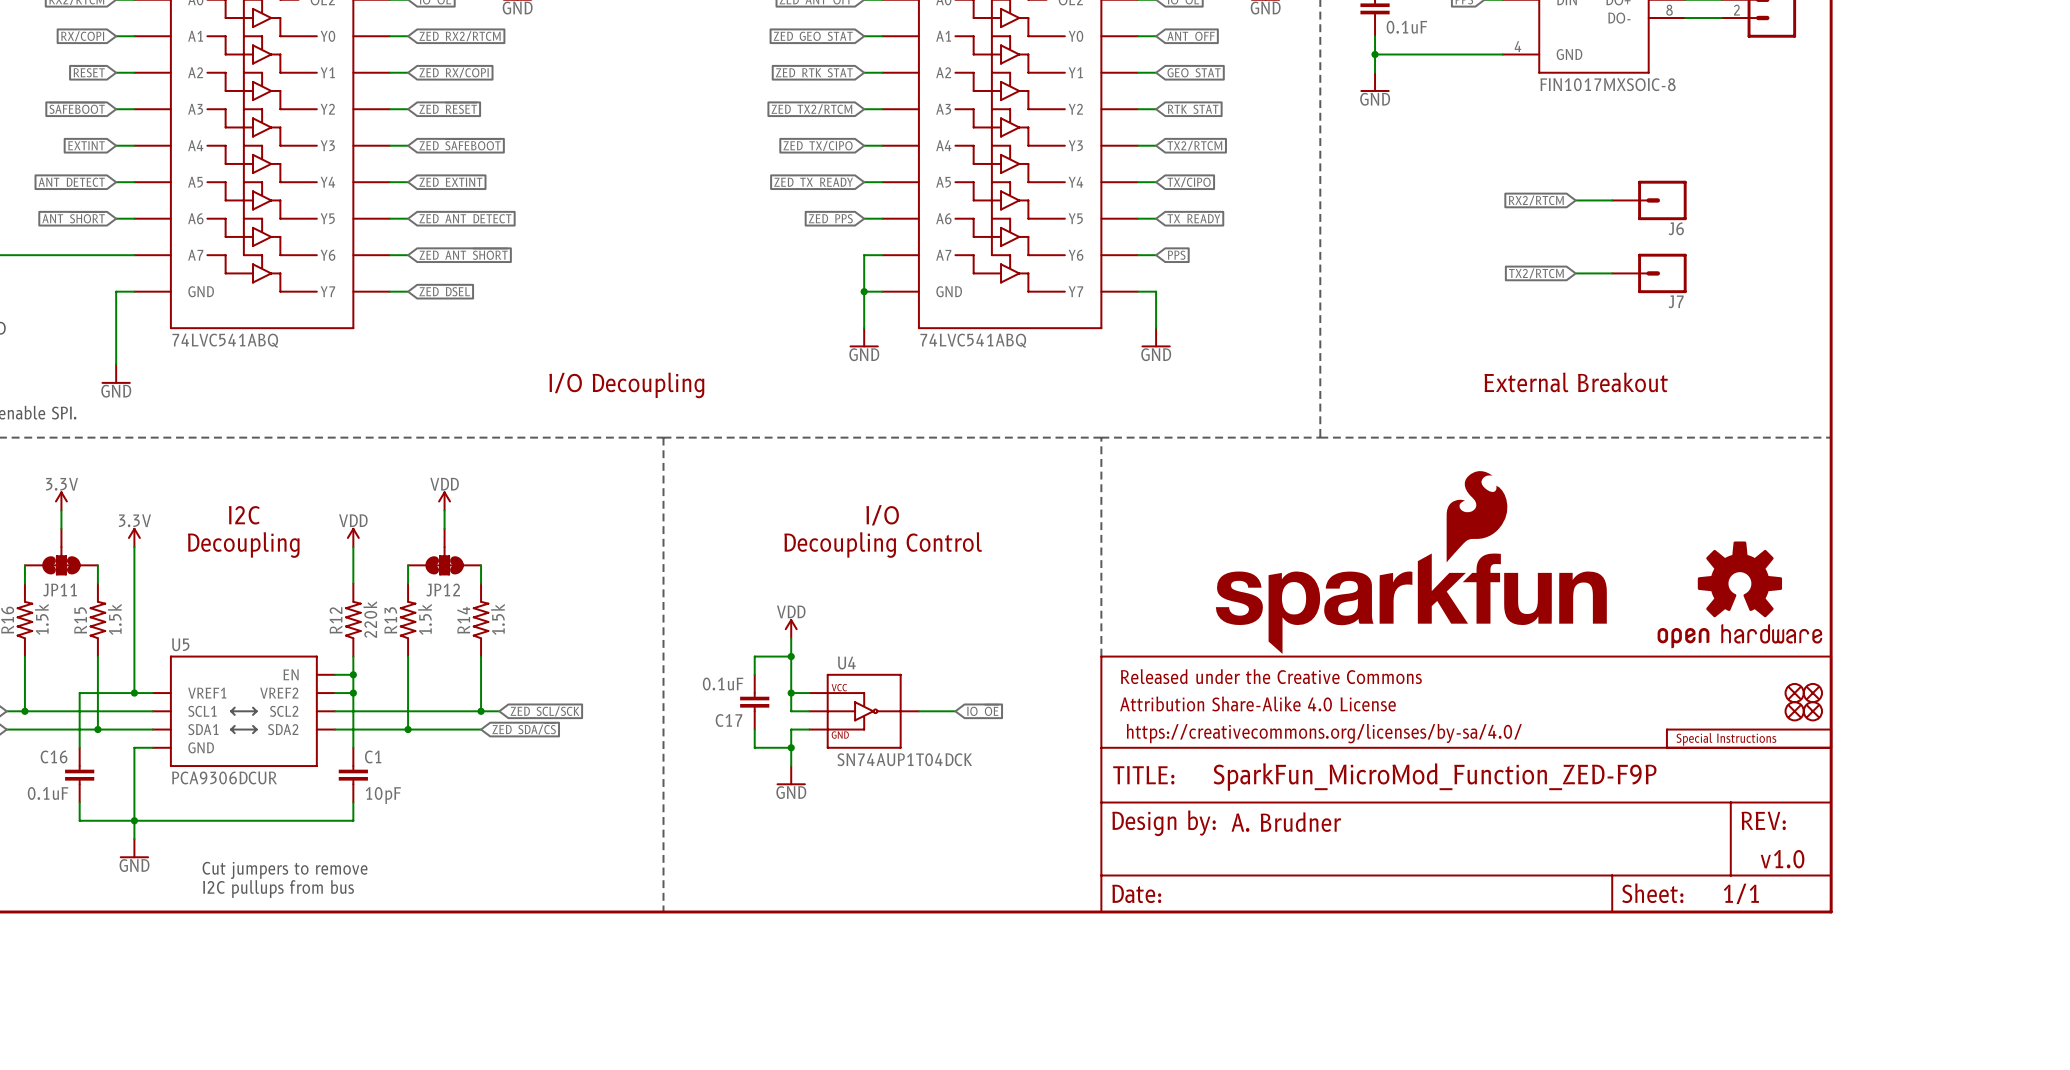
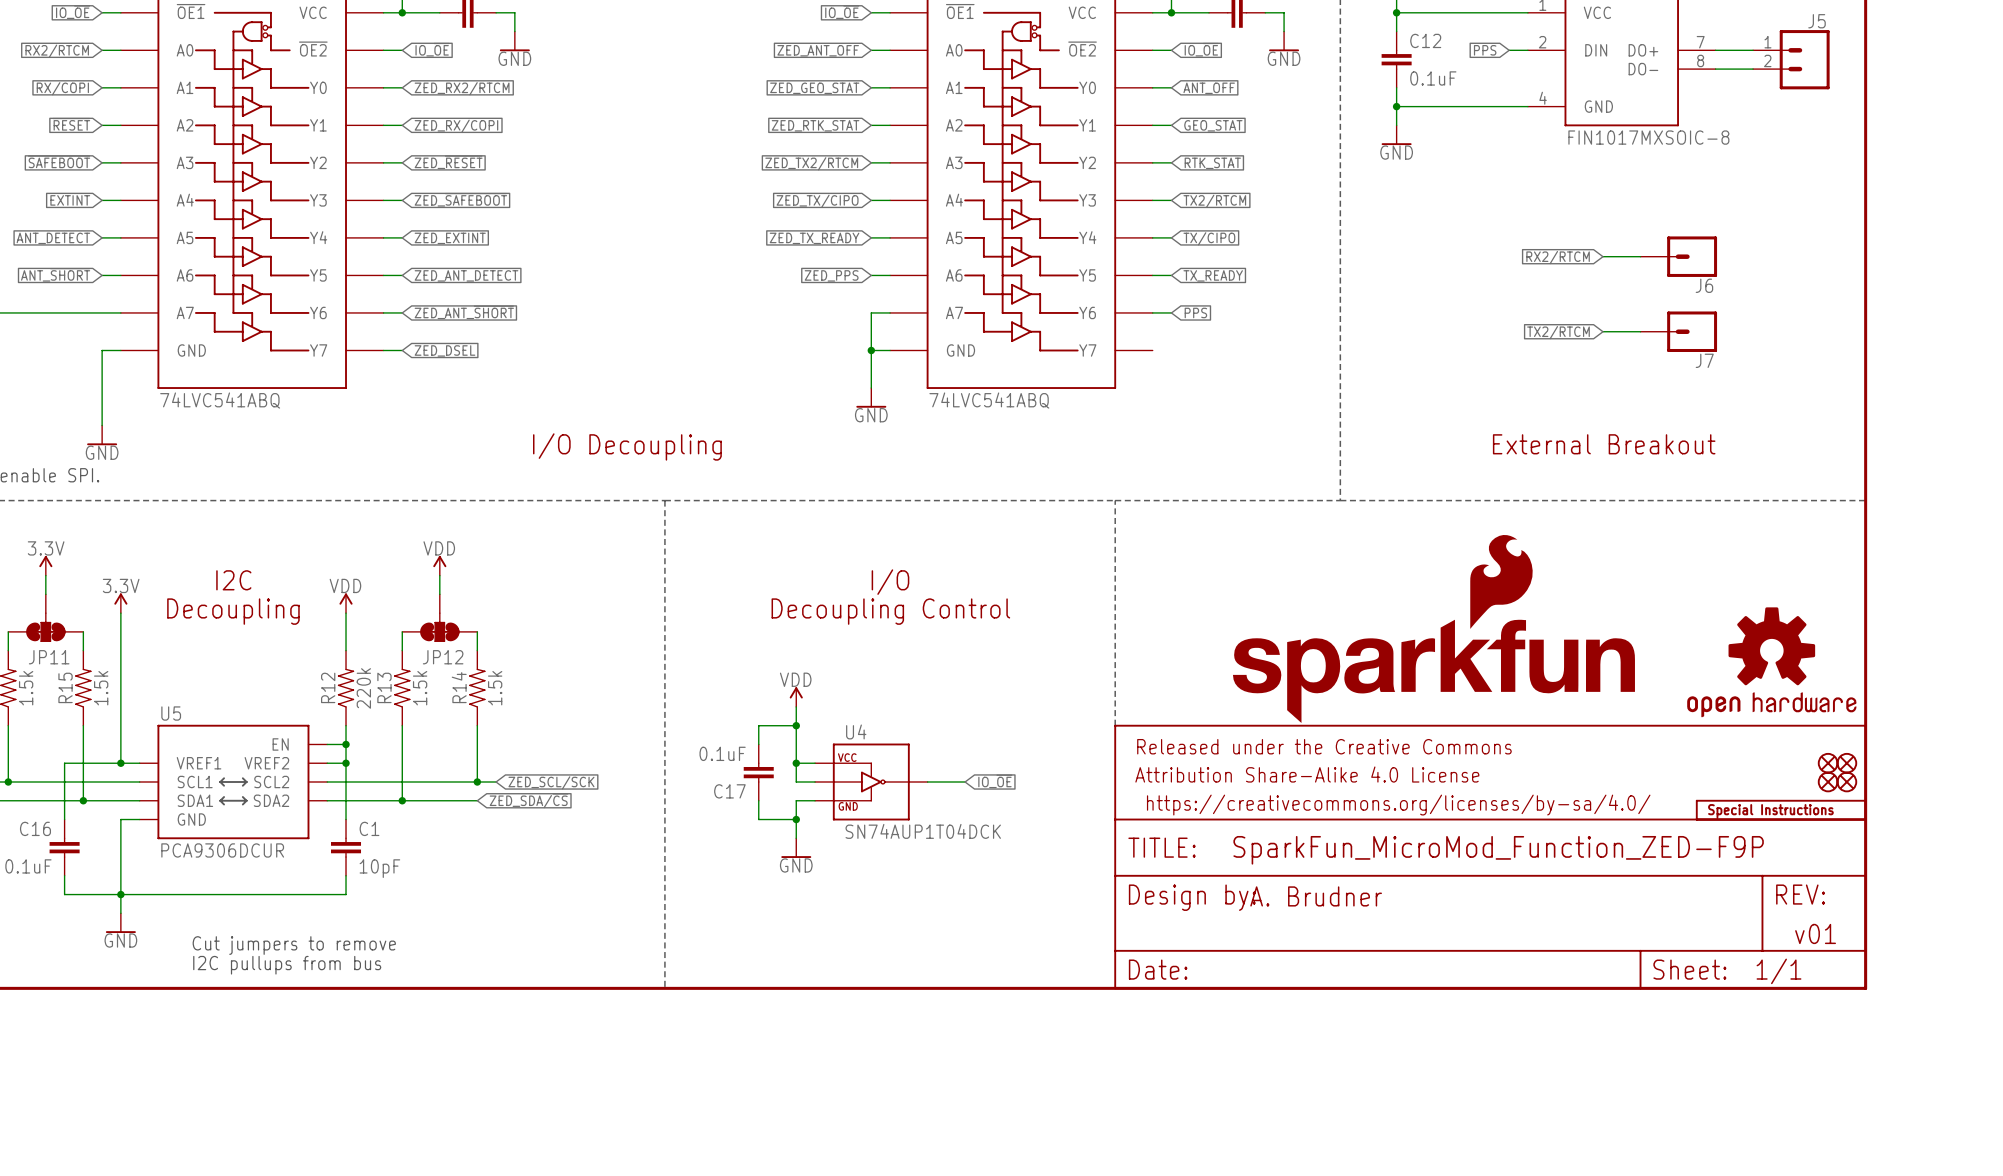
wire: (1137, 291) (1156, 291) (1156, 328) -> none
power symbol: GND (1156, 337) -> none
text: v1.0 (1782, 859) -> v01 (1815, 933)

